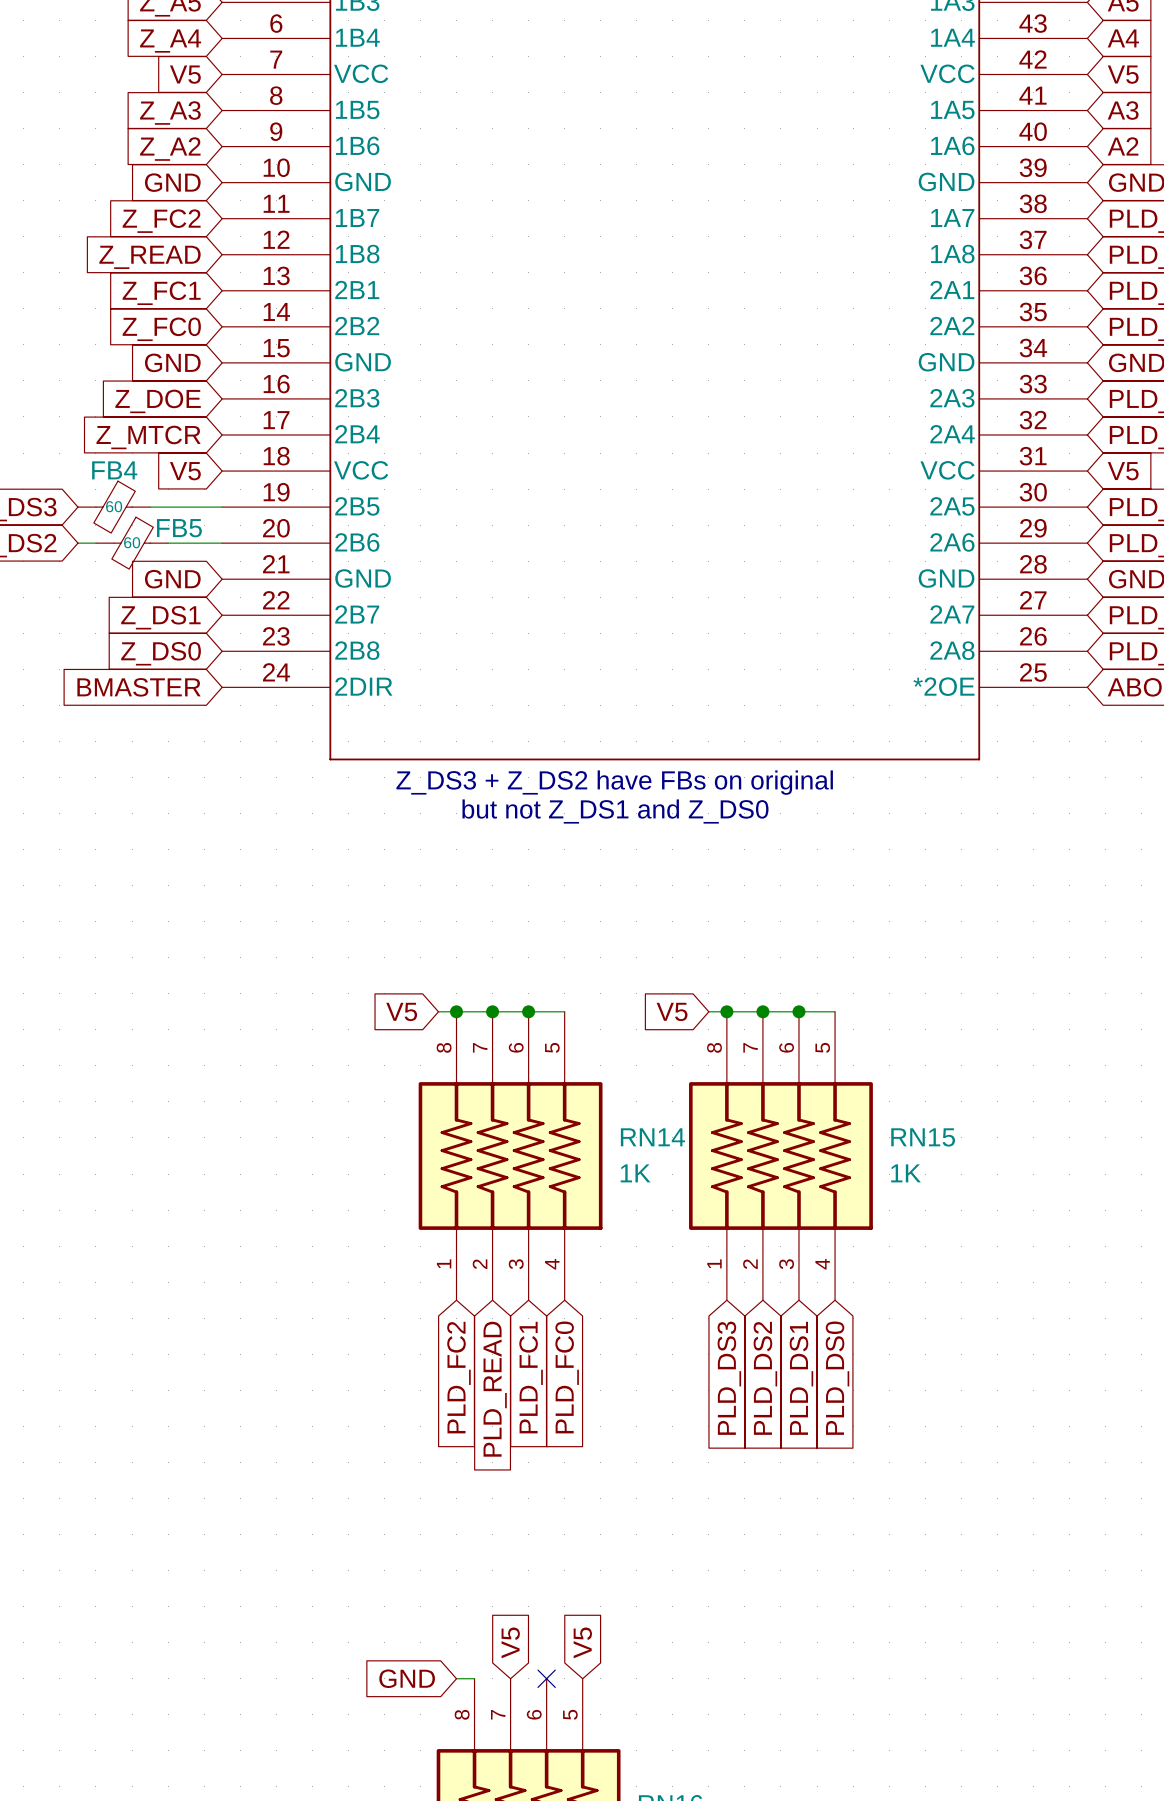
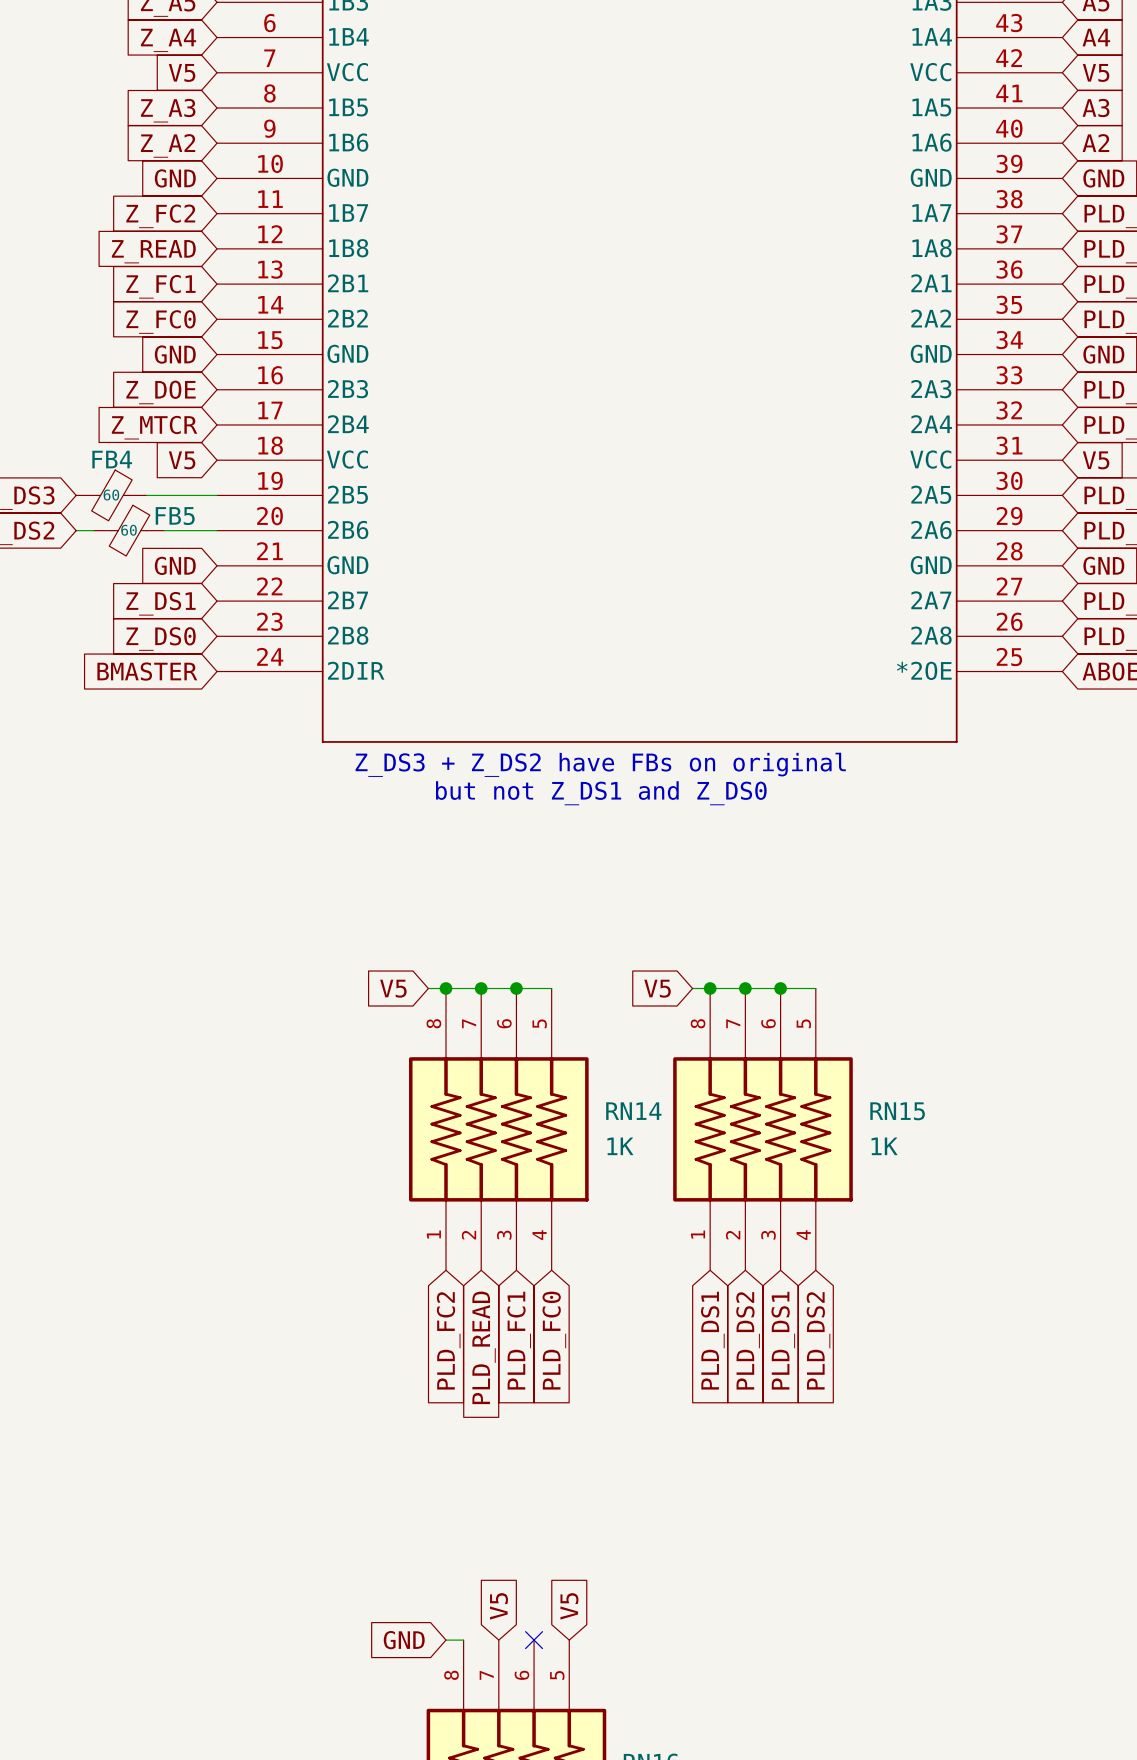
global label: PLD_DS3 (729, 1378) -> PLD_DS1 (712, 1340)
global label: PLD_DS0 (837, 1378) -> PLD_DS2 (818, 1340)

